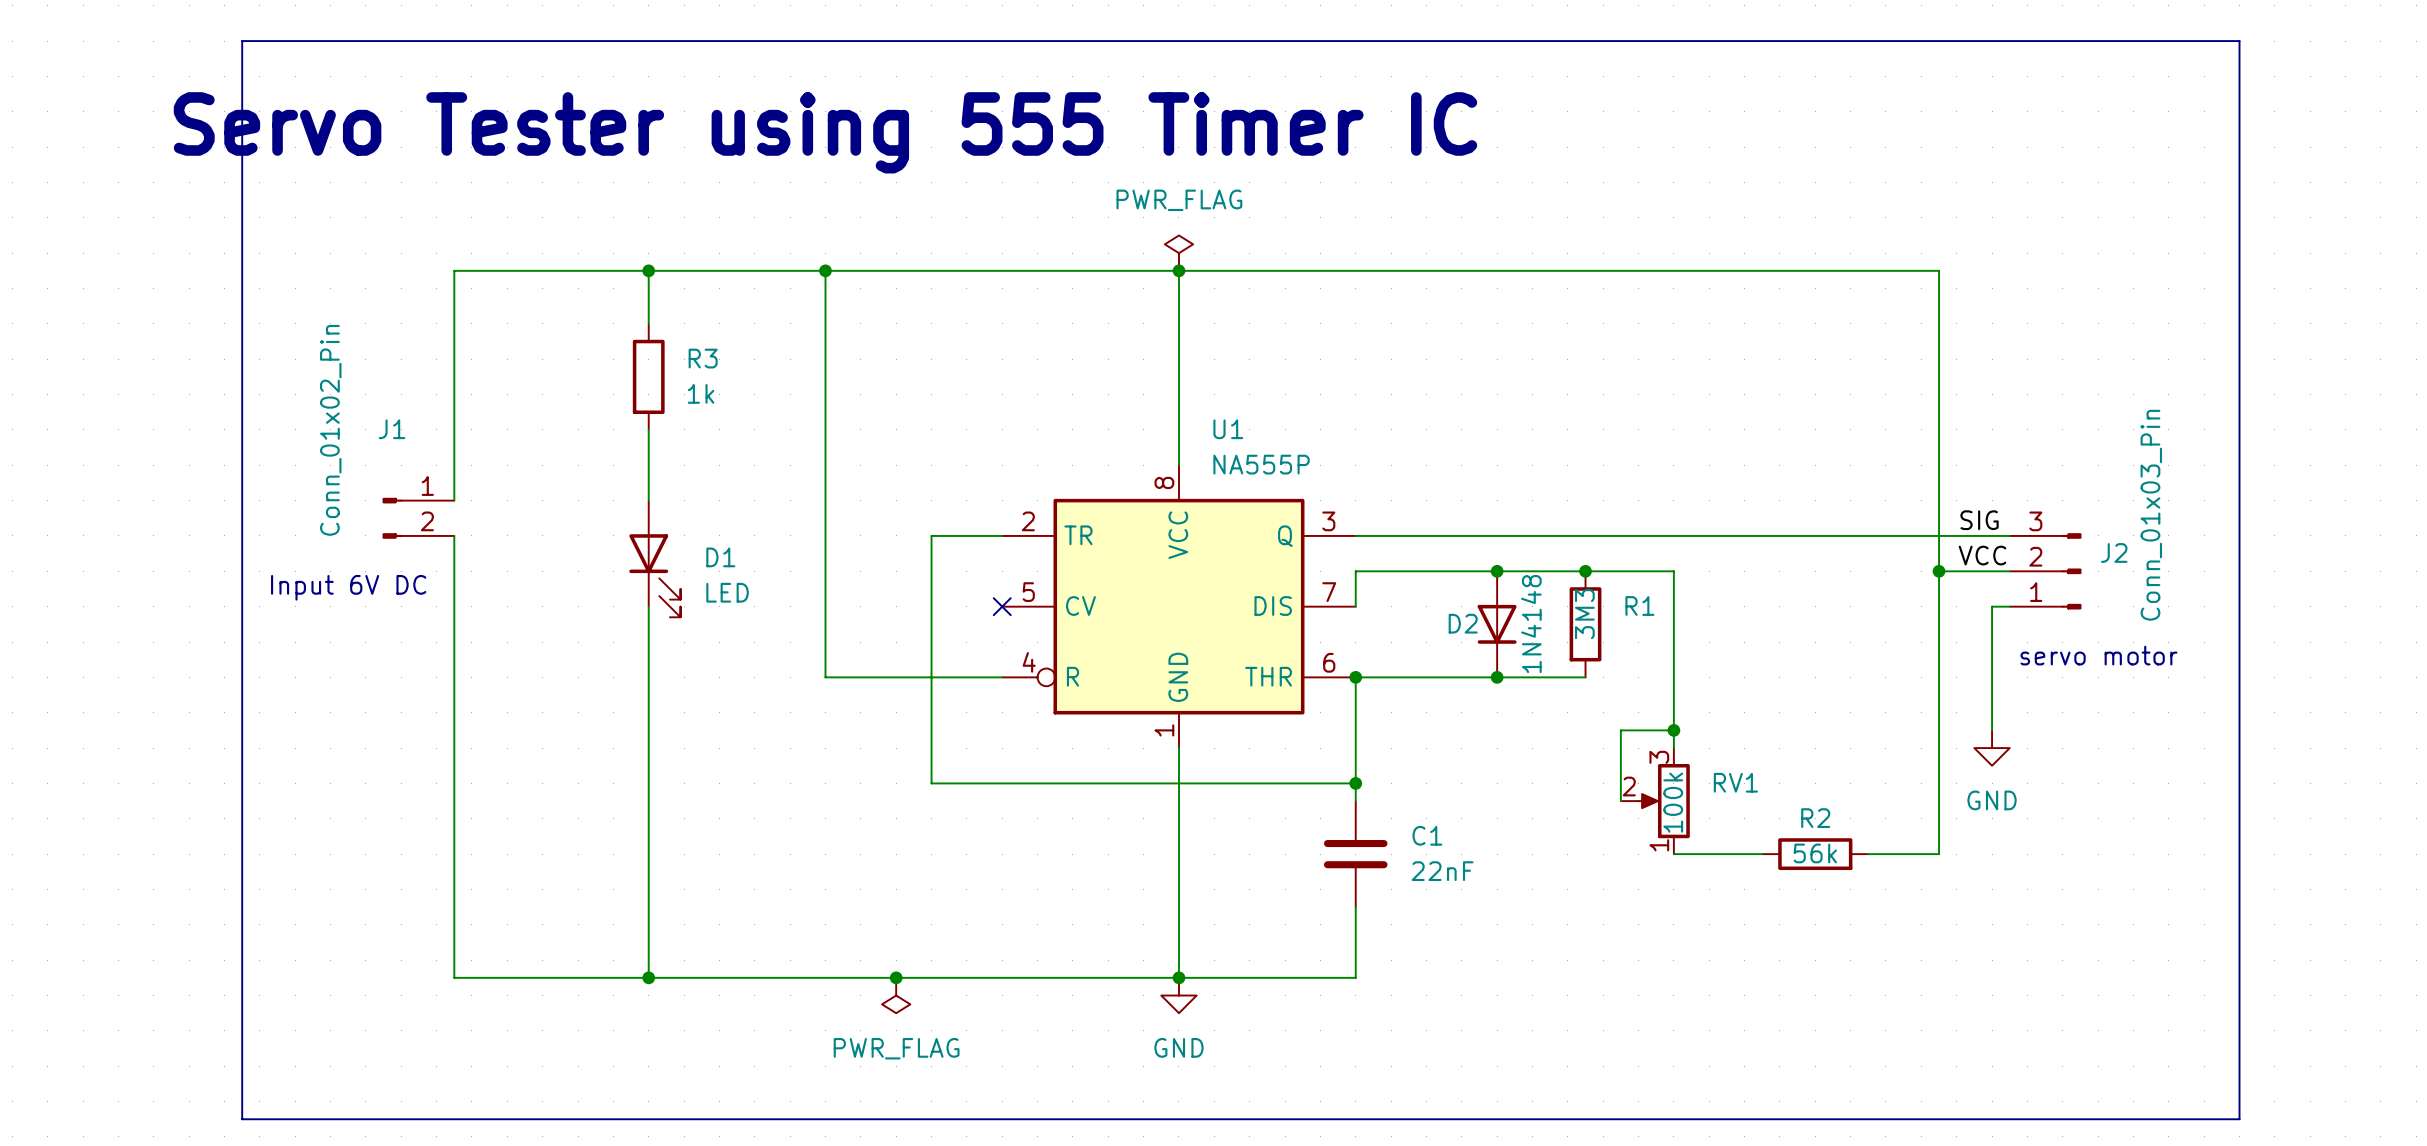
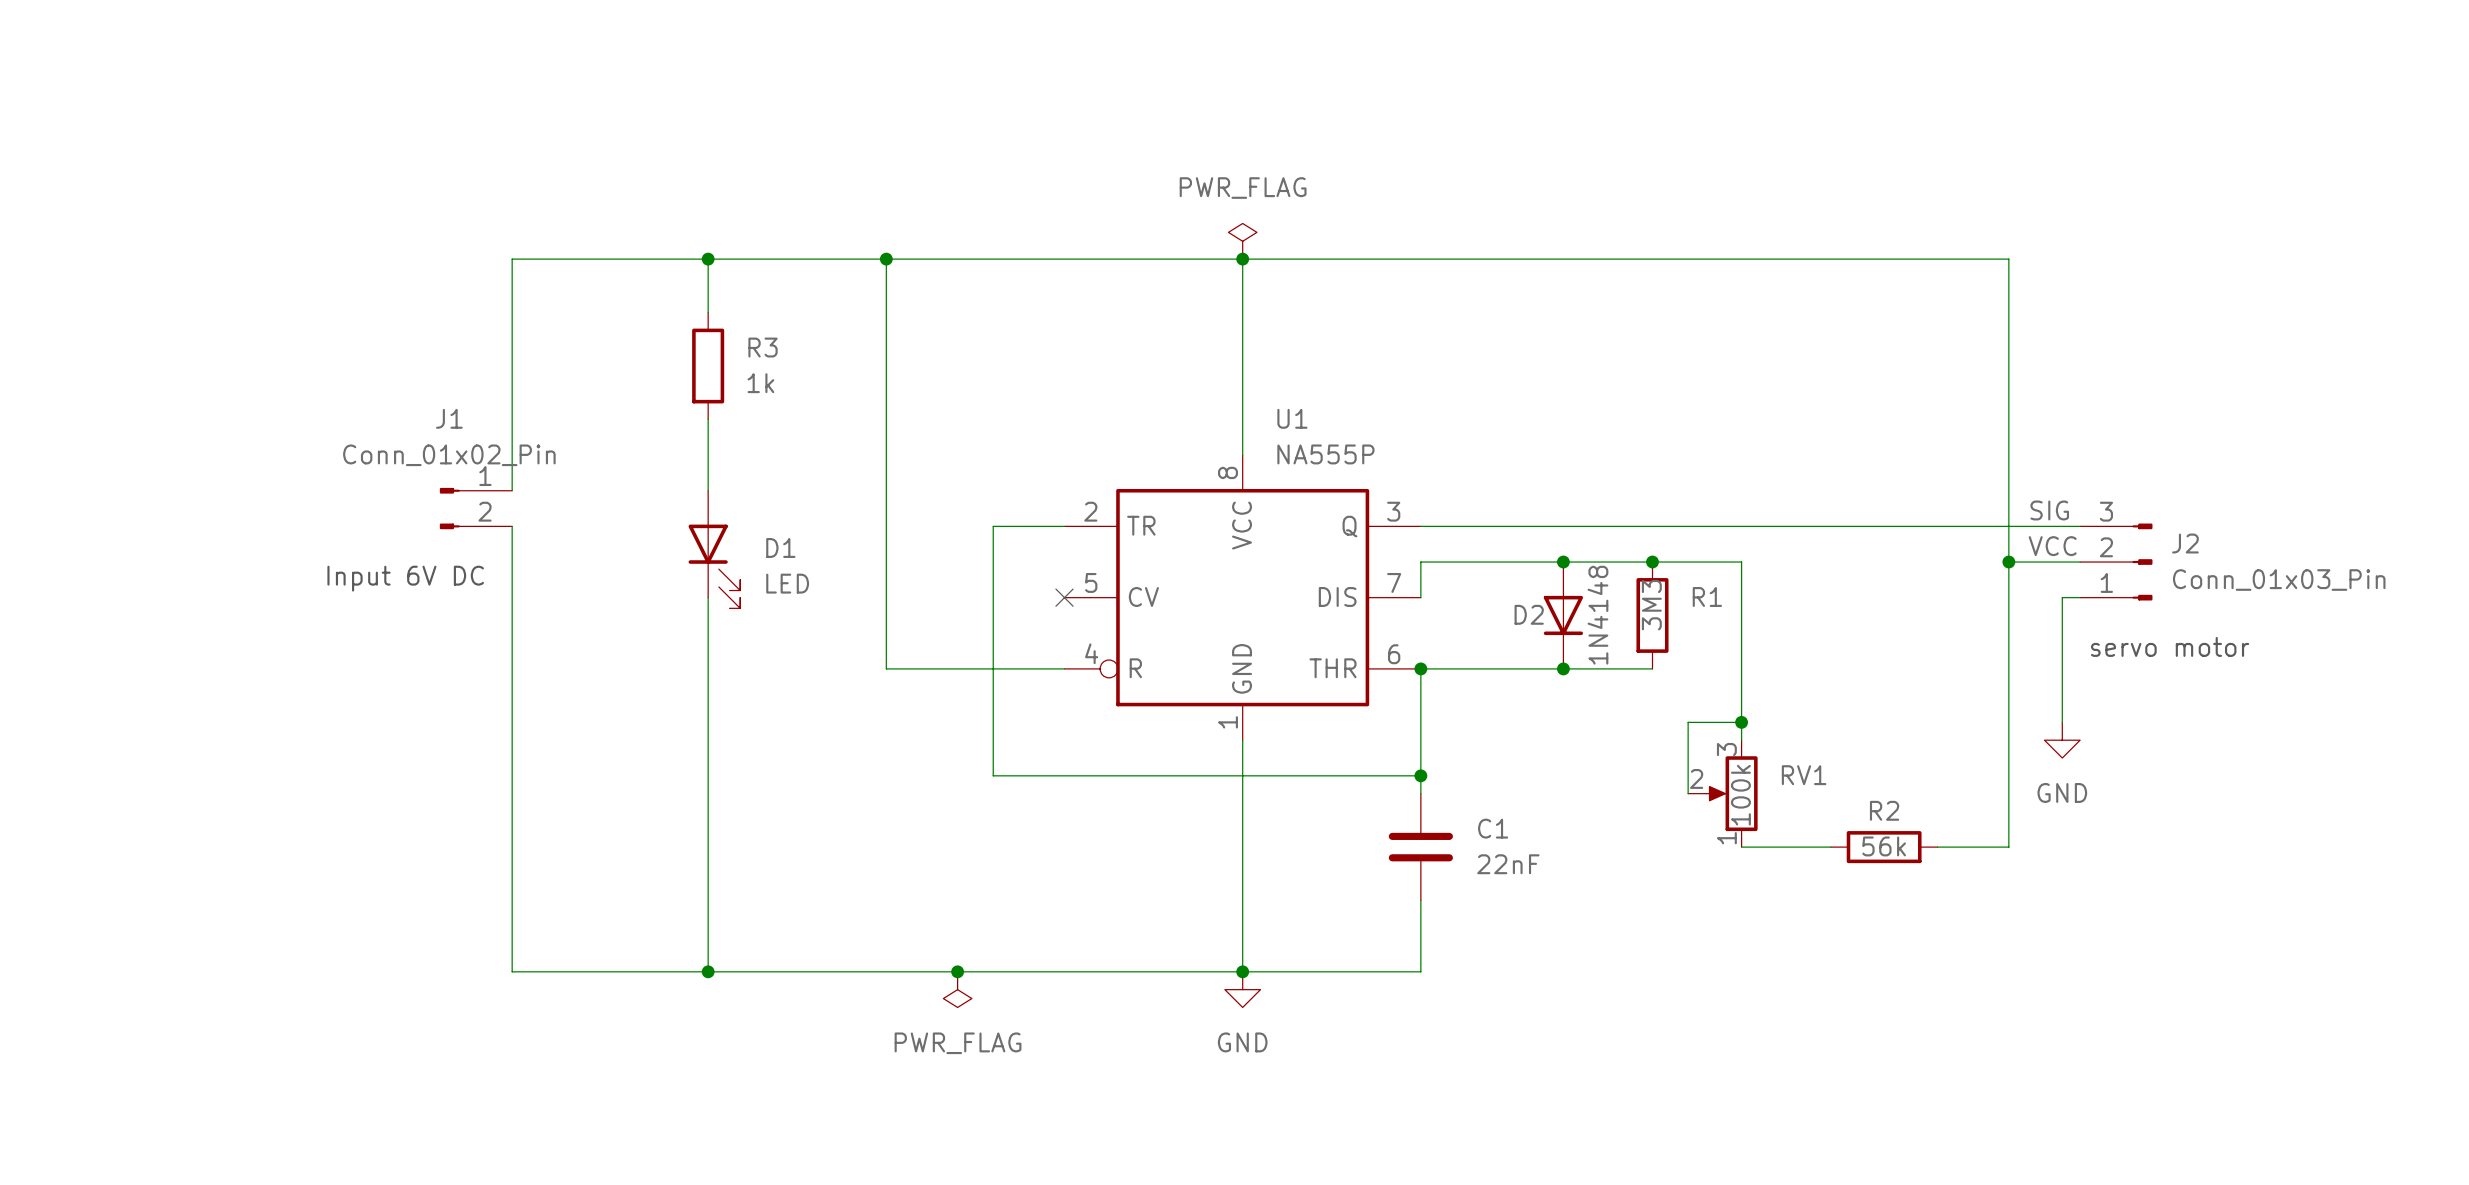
line: (242, 41) (2239, 41) (2239, 1119) (242, 1119) (242, 41) -> none
text: Servo Tester using 555 Timer IC (825, 132) -> none
J1 value rotation: 0° (330, 430) -> 90° clockwise (449, 455)
J2 value rotation: 0° (2151, 515) -> 90° clockwise (2279, 580)

